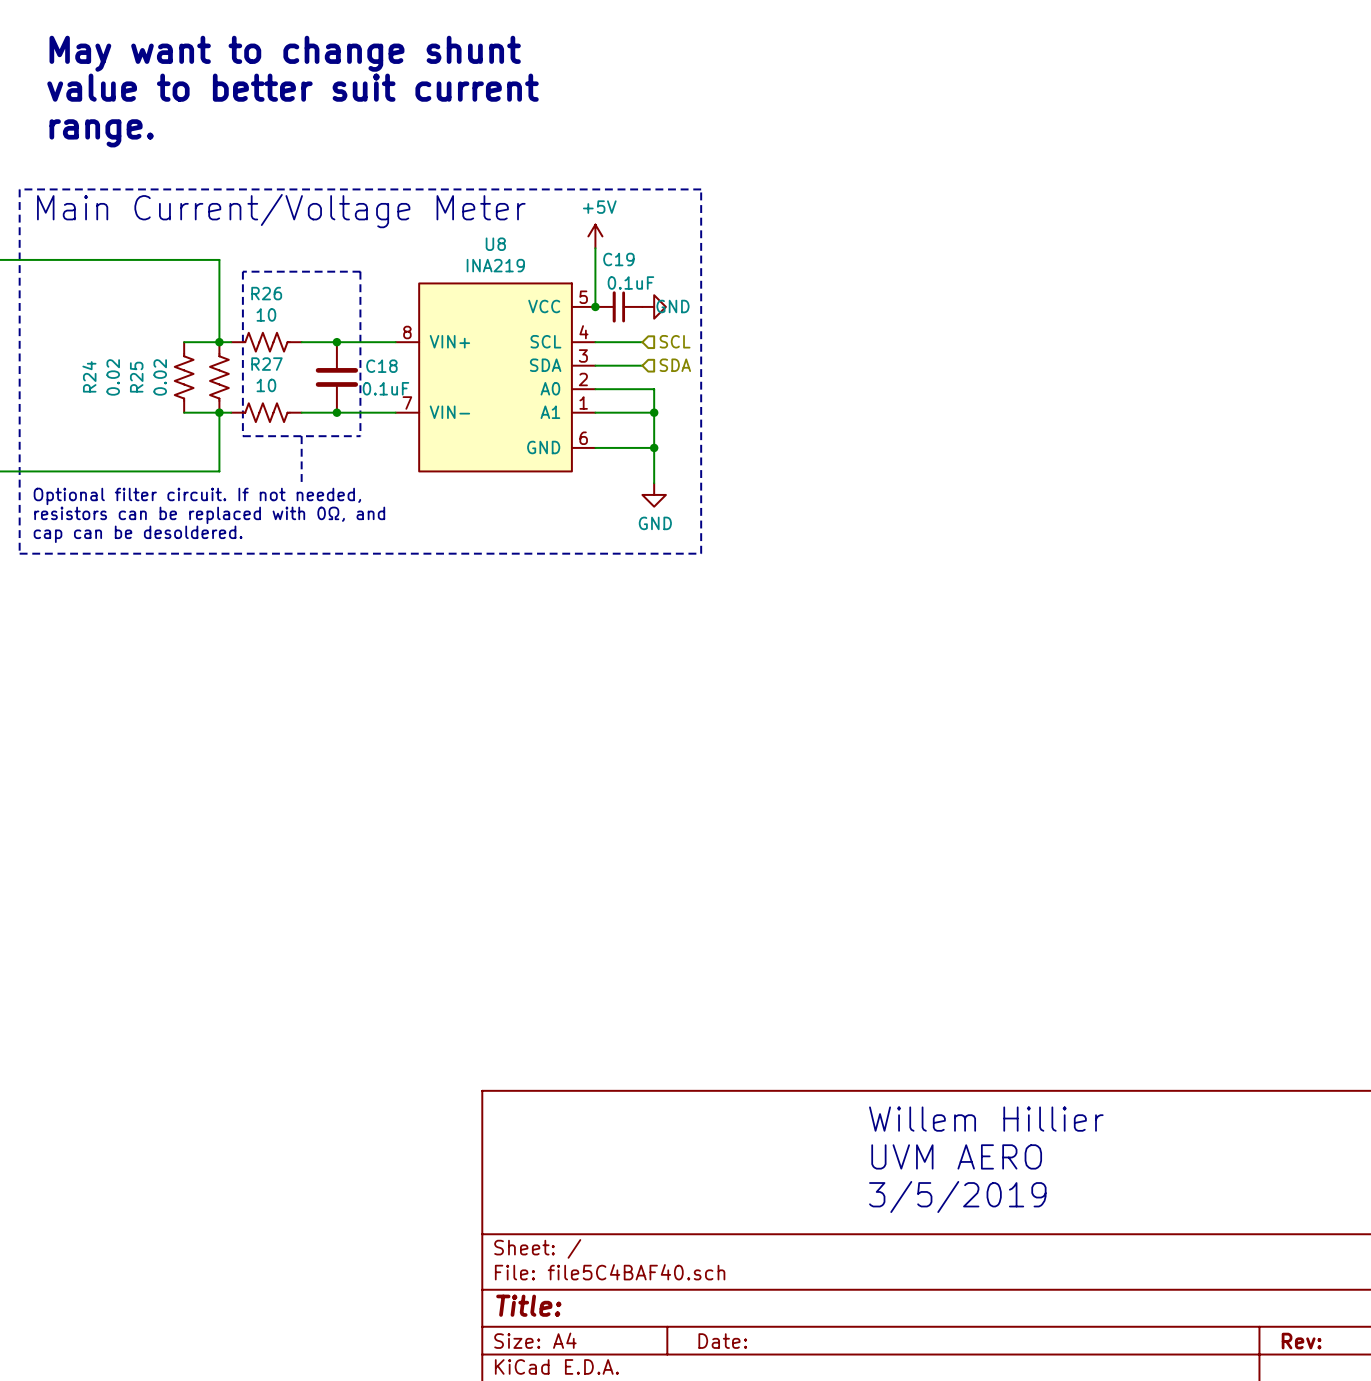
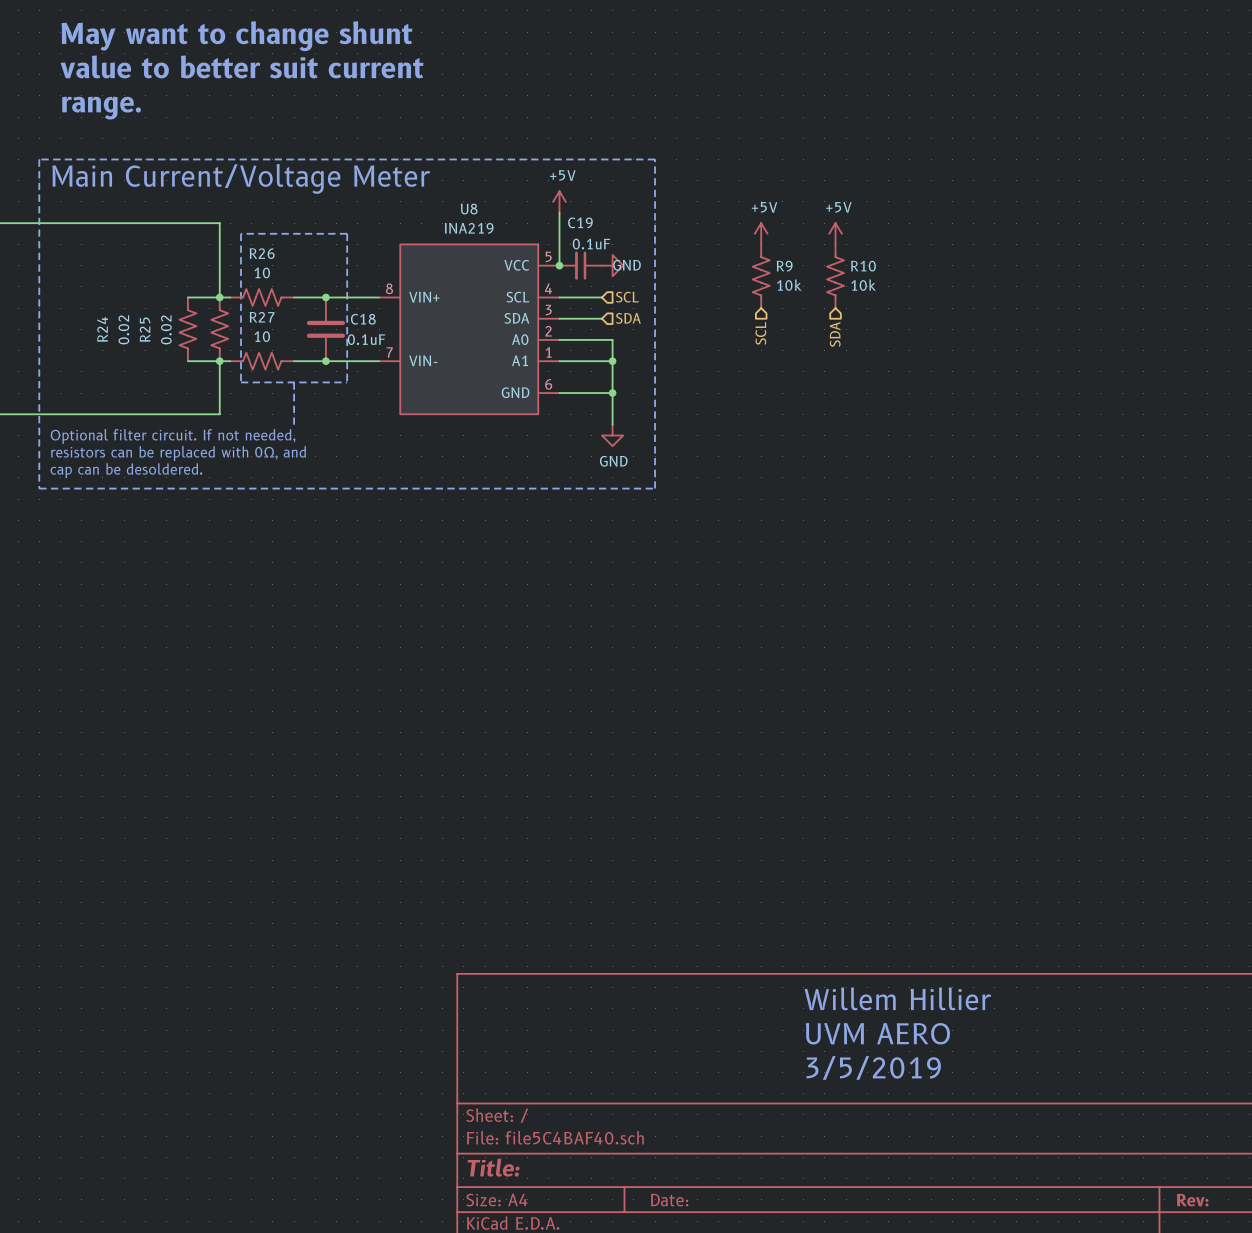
power symbol: none -> +5V (761, 233)
power symbol: none -> +5V (835, 233)
R9: none -> 10k (761, 276)
R10: none -> 10k (835, 276)
hierarchical label: none -> SCL (760, 333)
hierarchical label: none -> SDA (835, 334)

